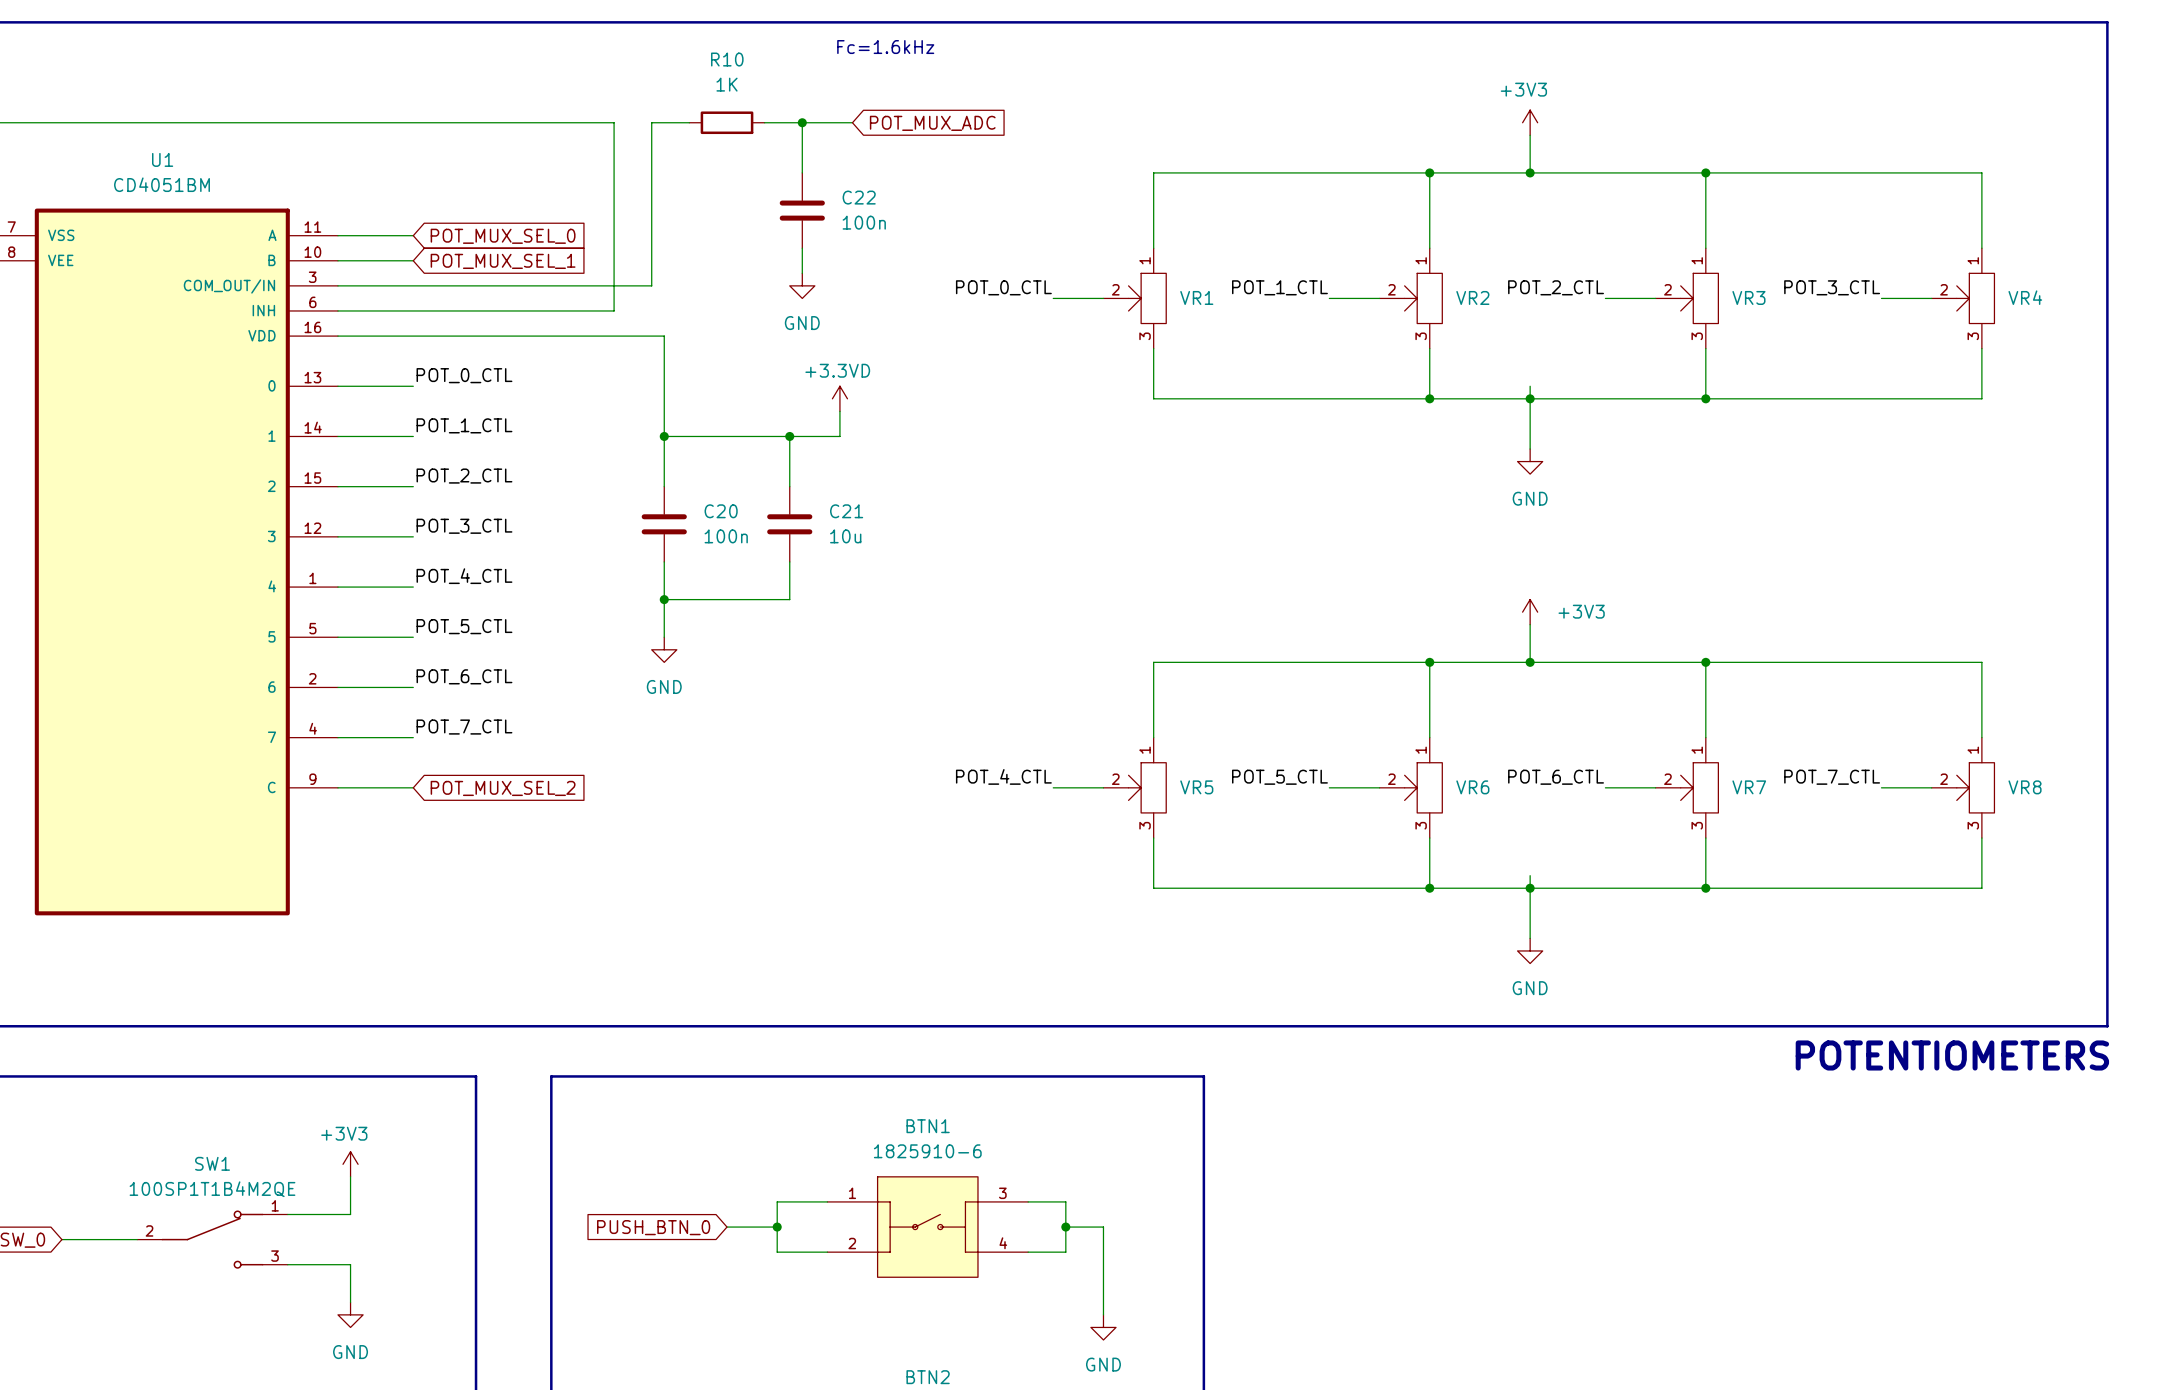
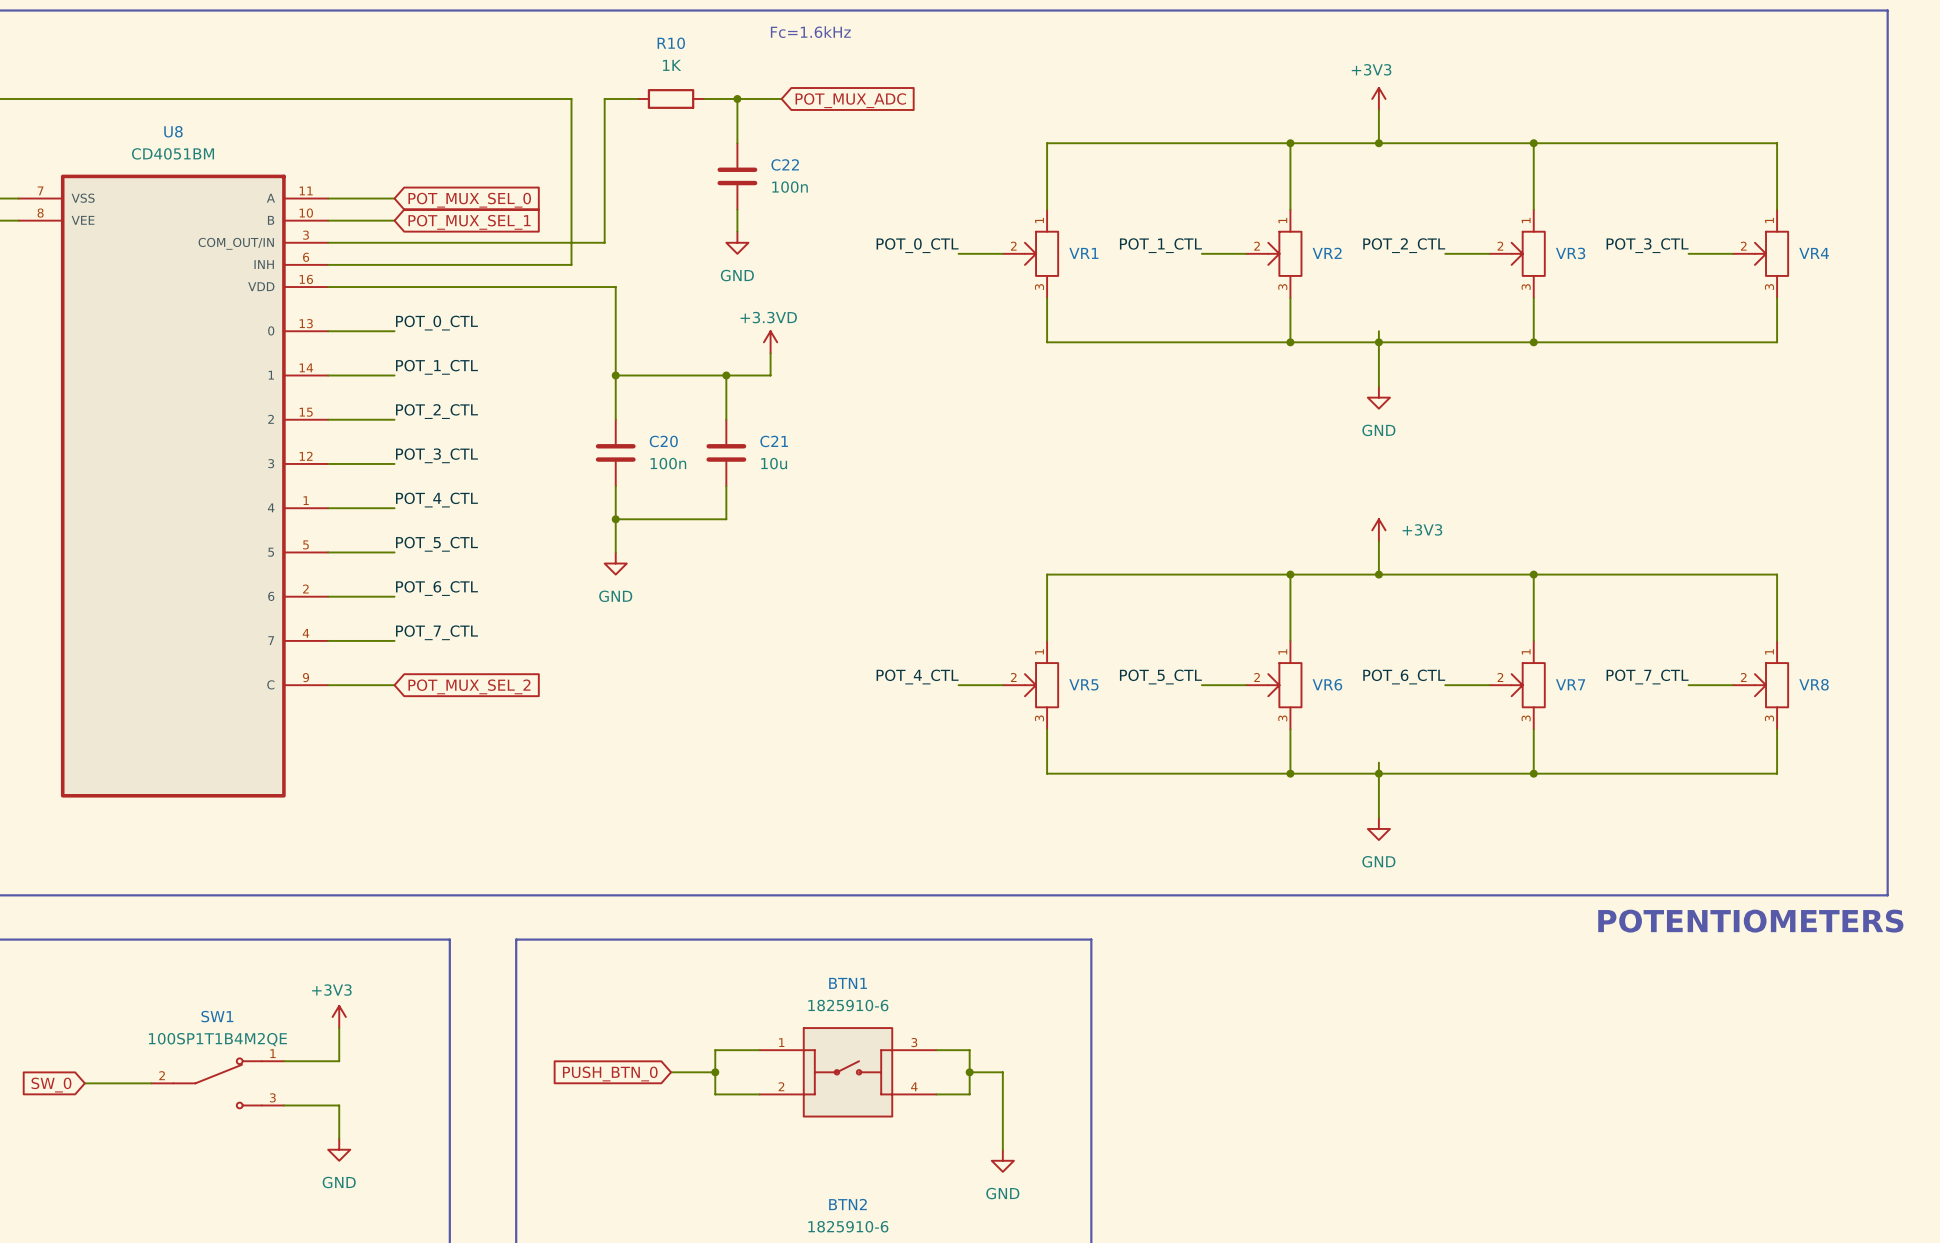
U1 name: U1 (162, 159) -> U8 (173, 131)

